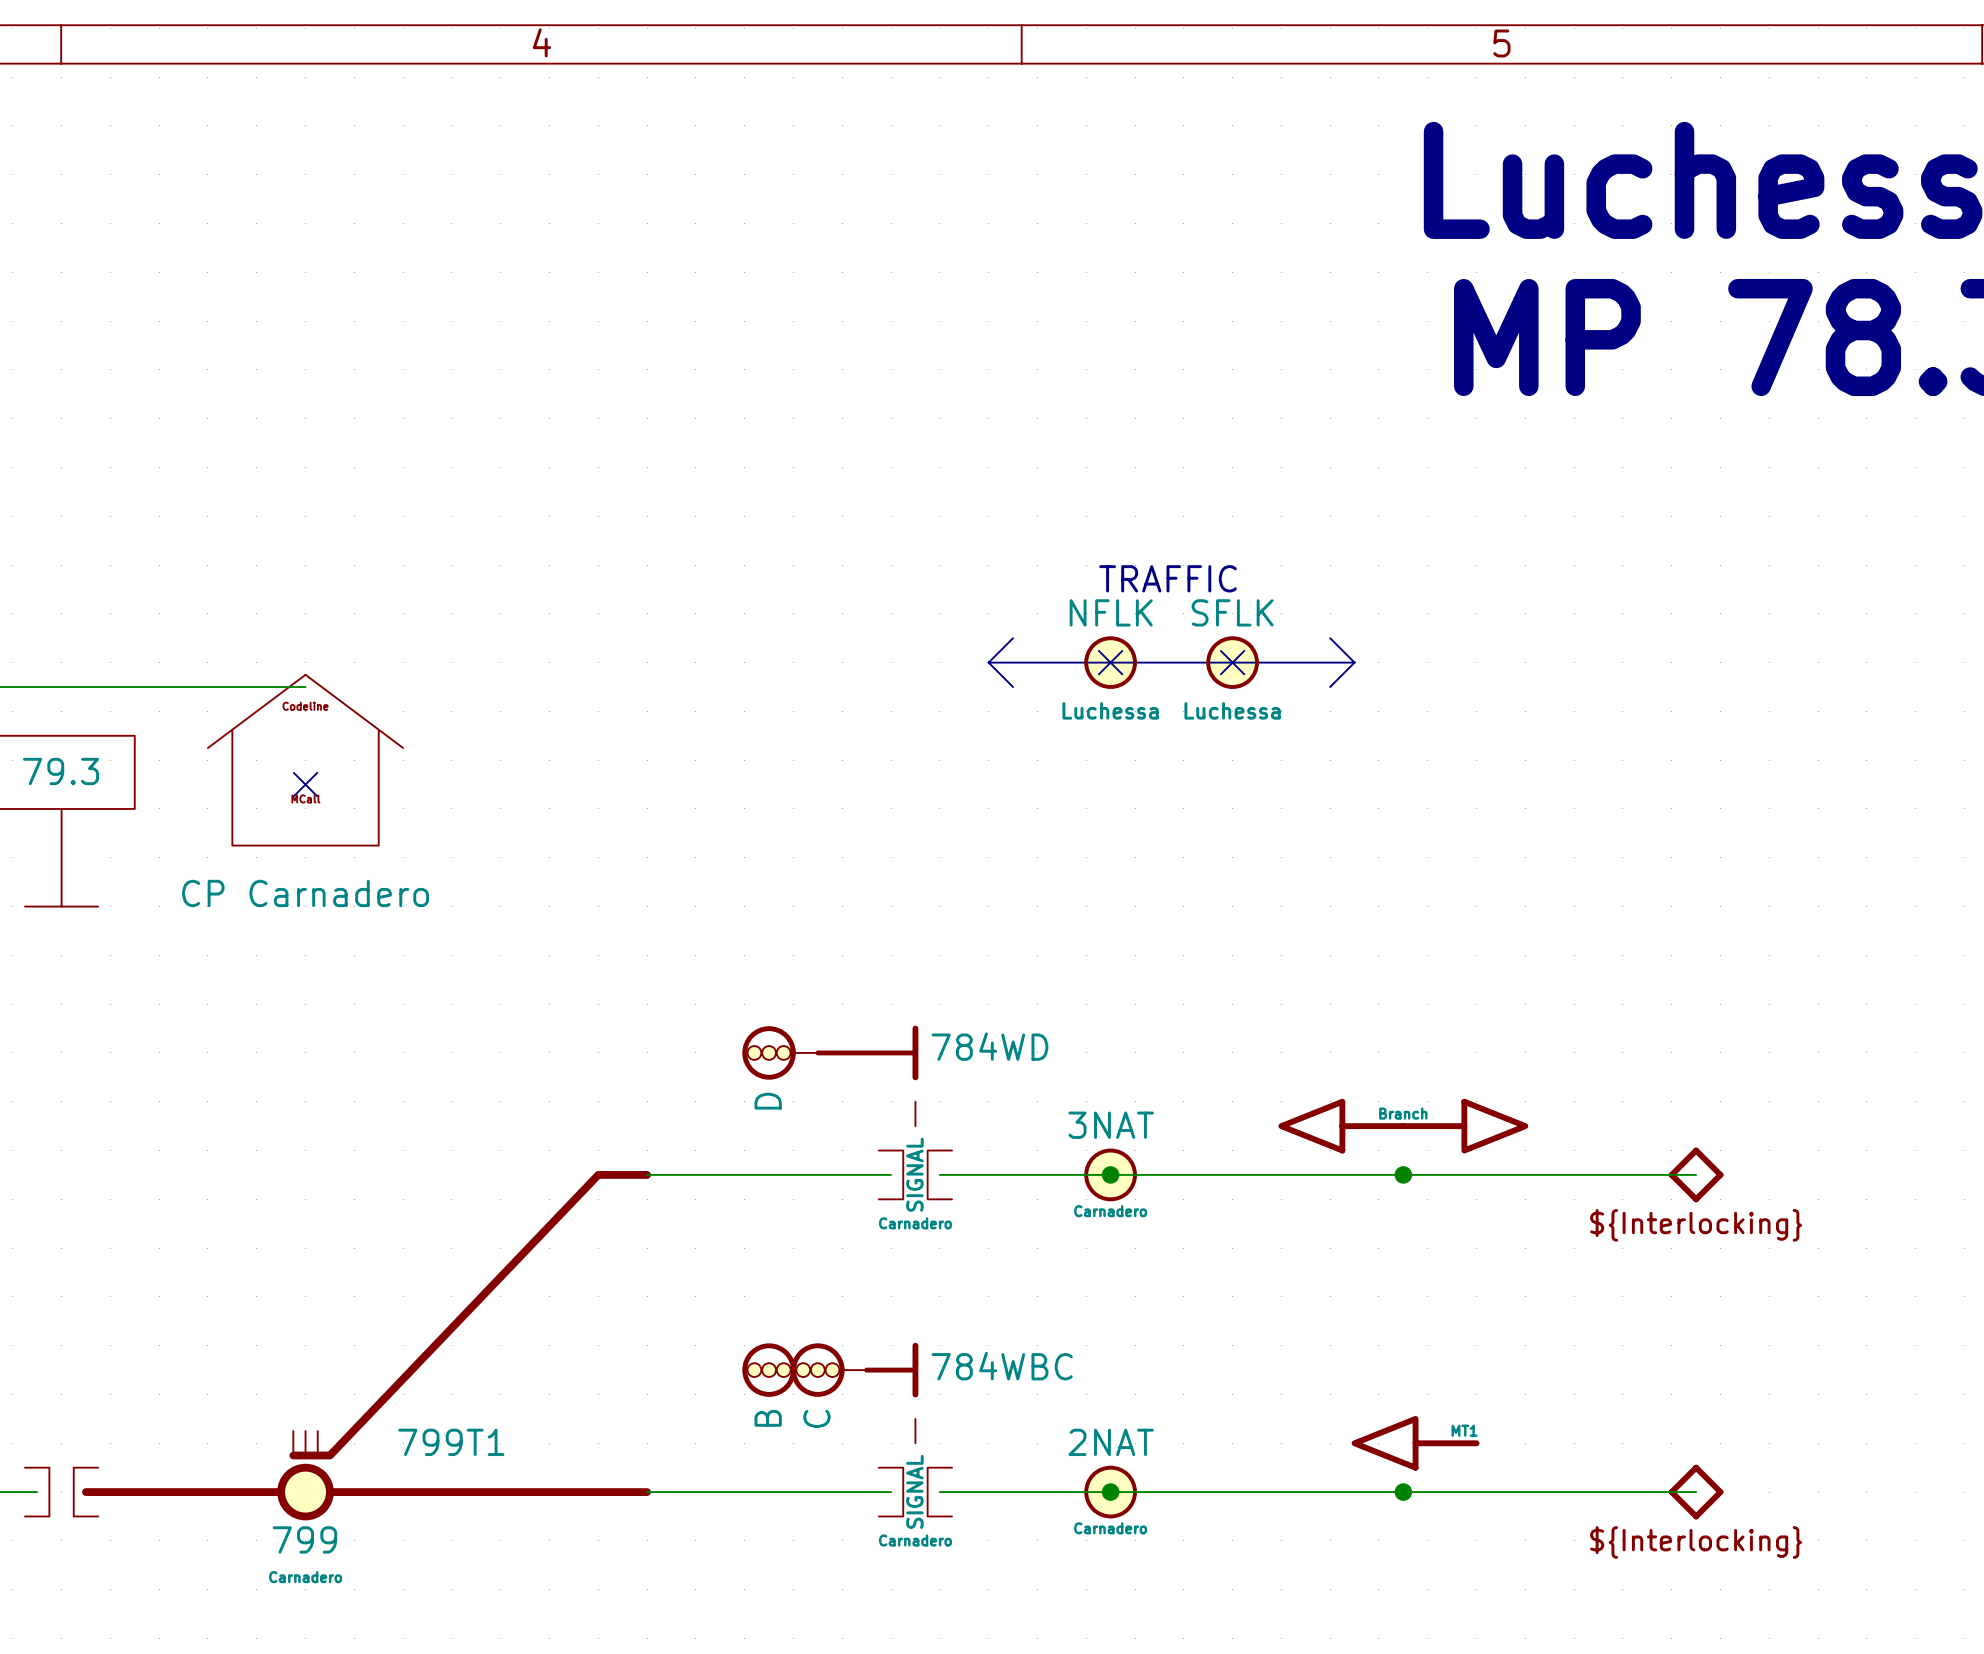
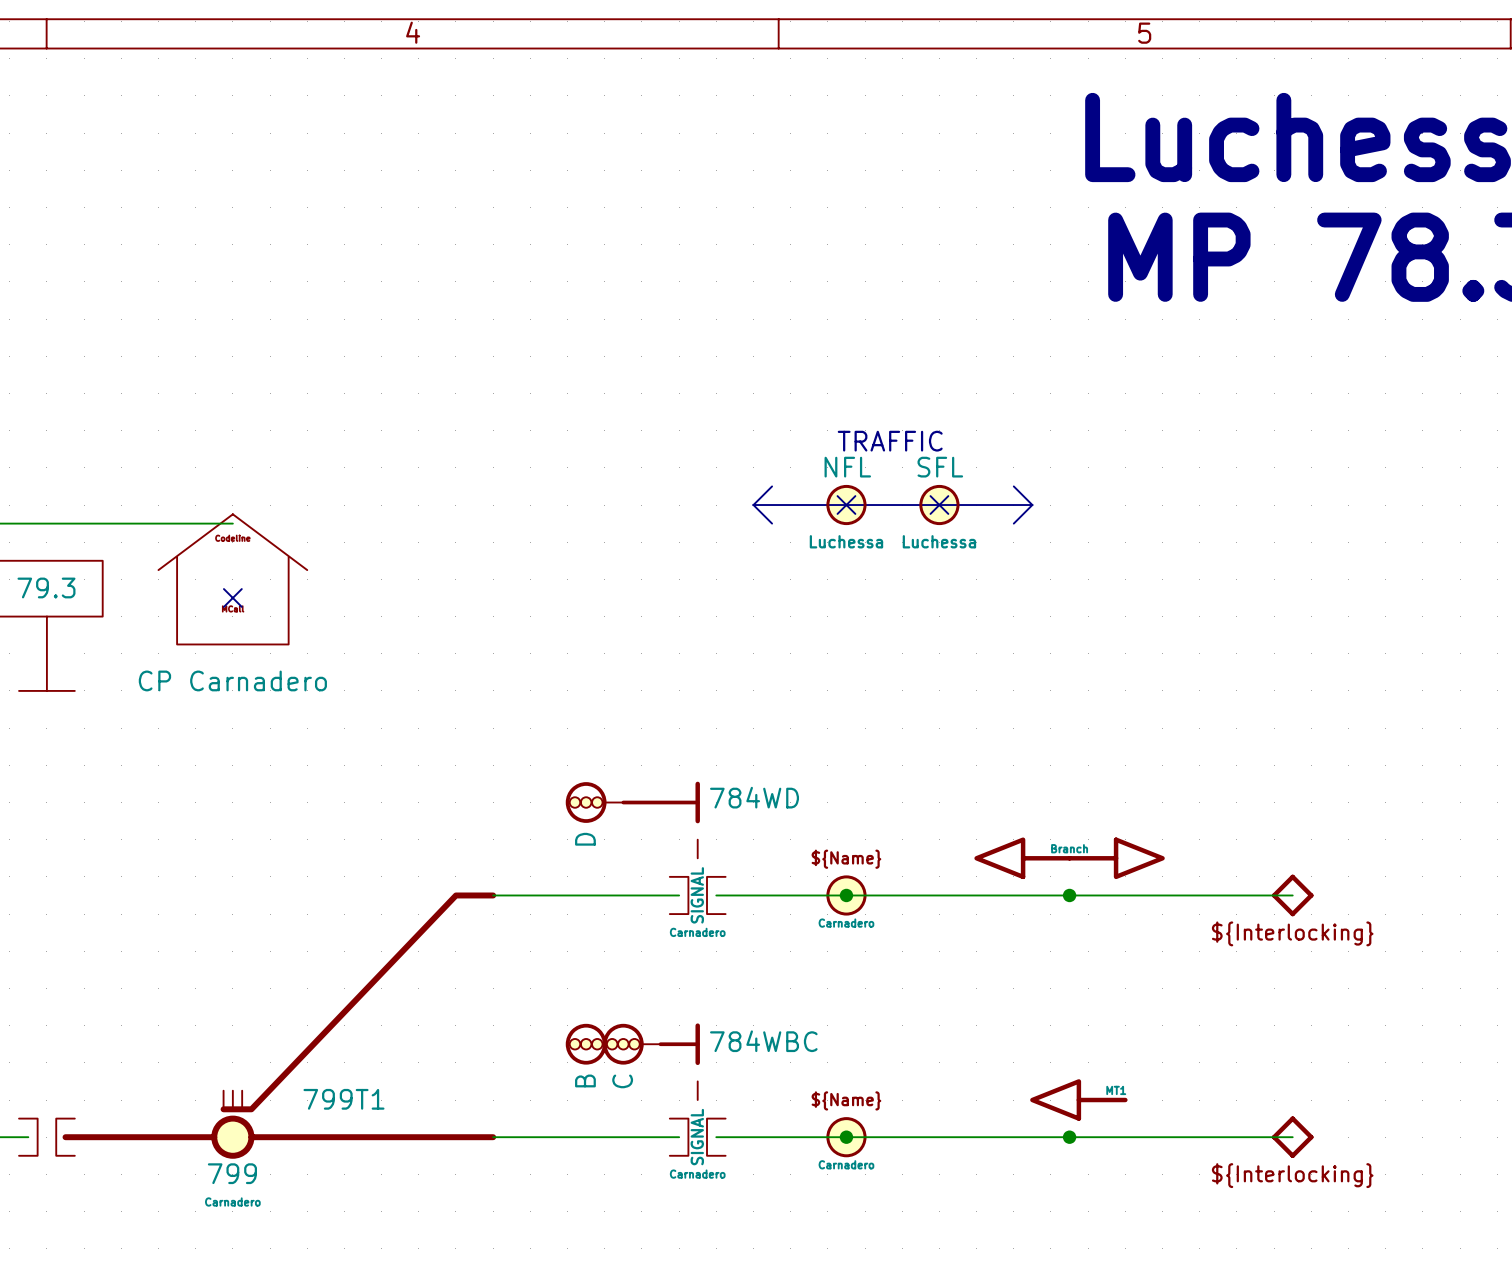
part value: NFLK (1111, 612) -> NFL (847, 467)
part value: SFLK (1232, 612) -> SFL (940, 467)
part value: 3NAT (1111, 1125) -> none
part text: none -> ${Name} (846, 859)
part value: 2NAT (1111, 1442) -> none
part text: none -> ${Name} (846, 1100)

